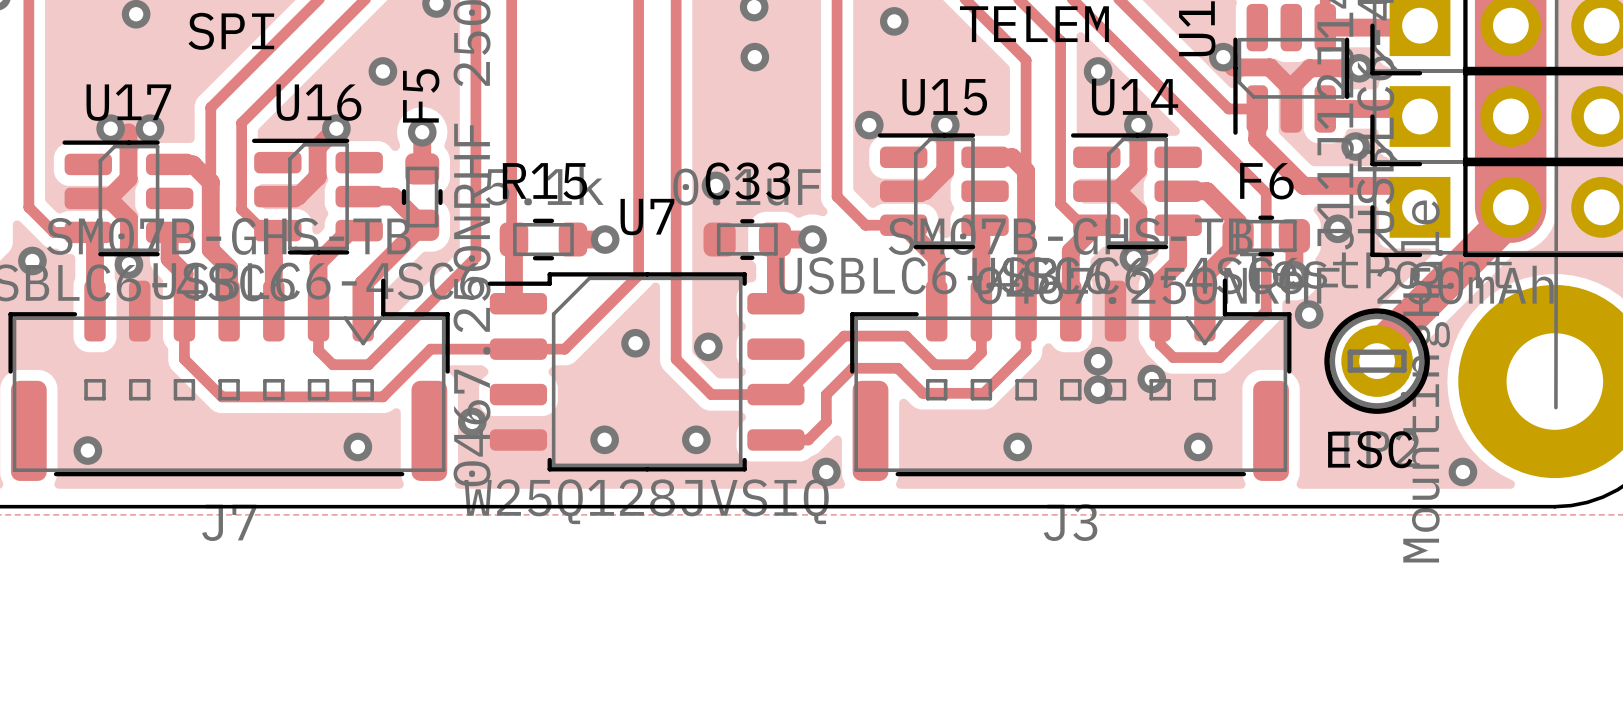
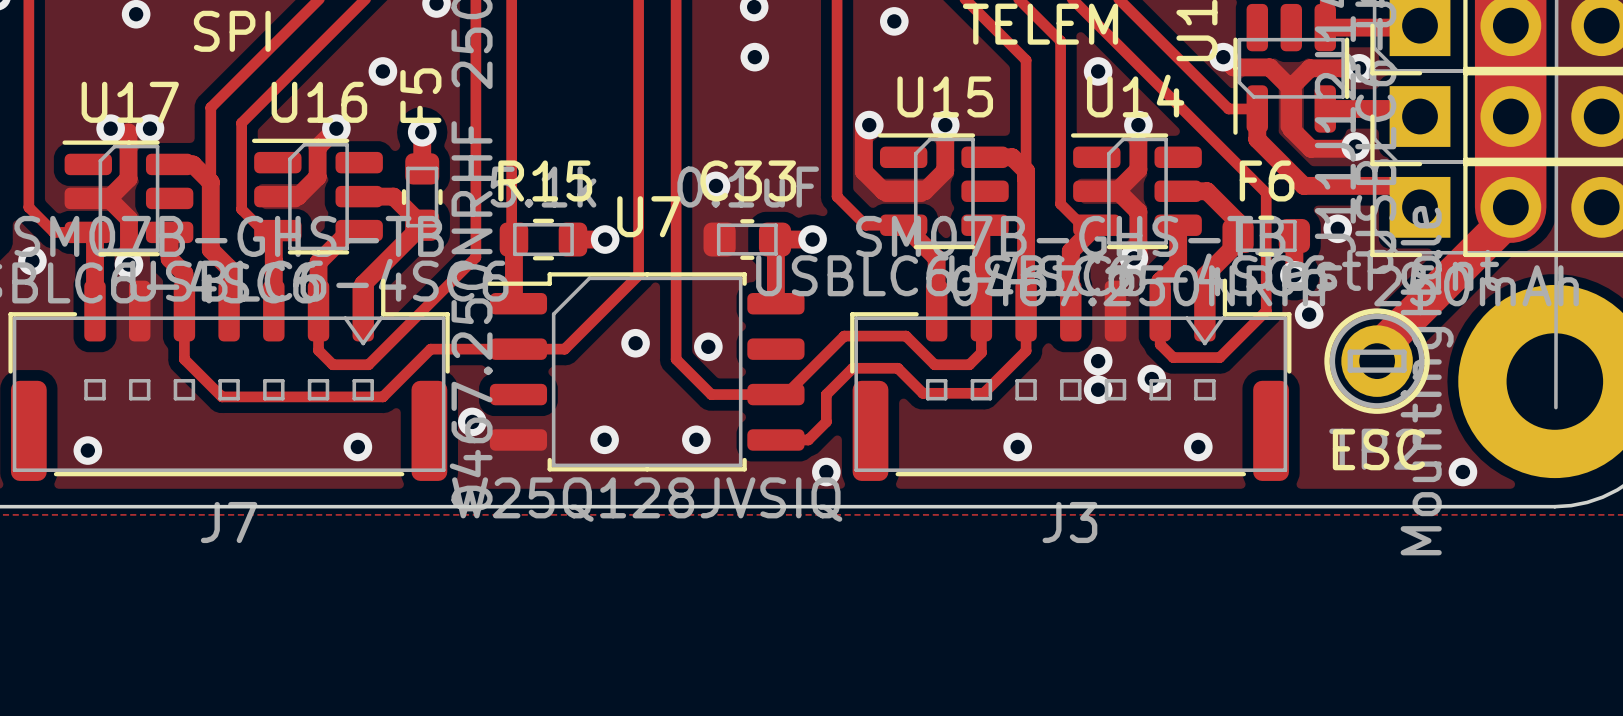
track: none -> (1291, 108) (1291, 129) (1310, 148) (1353, 148) (1355, 146)
track: none -> (869, 125) (863, 130) (863, 171) (883, 191) (903, 191)

